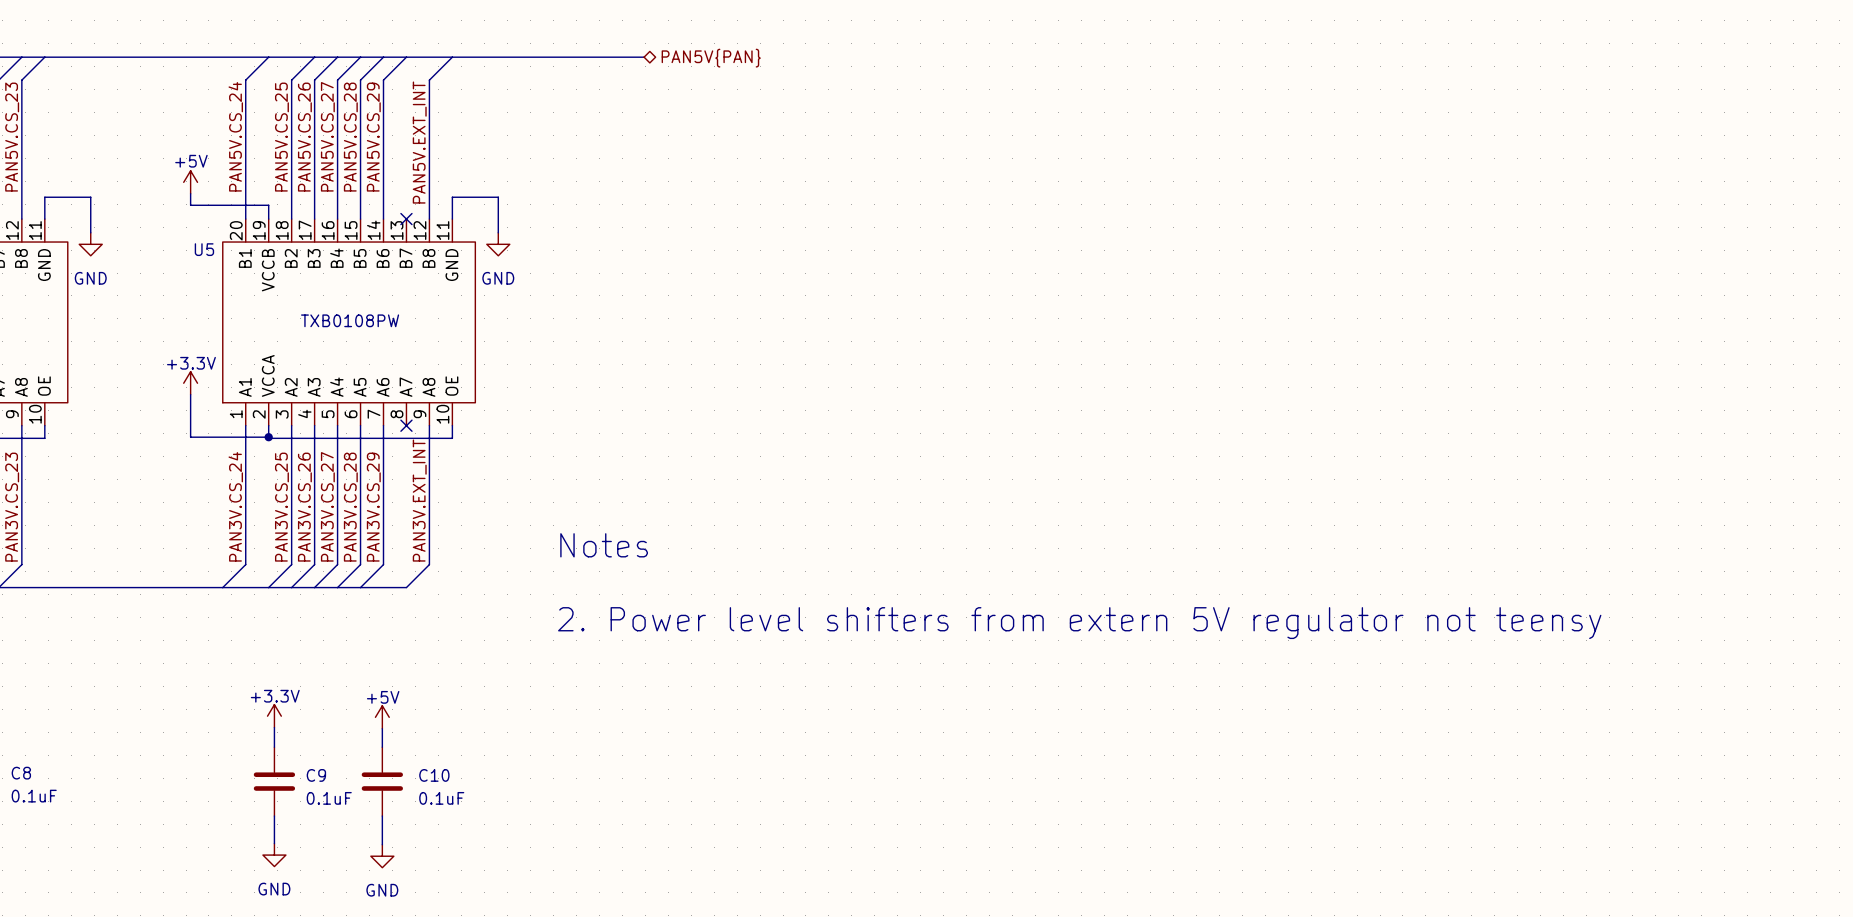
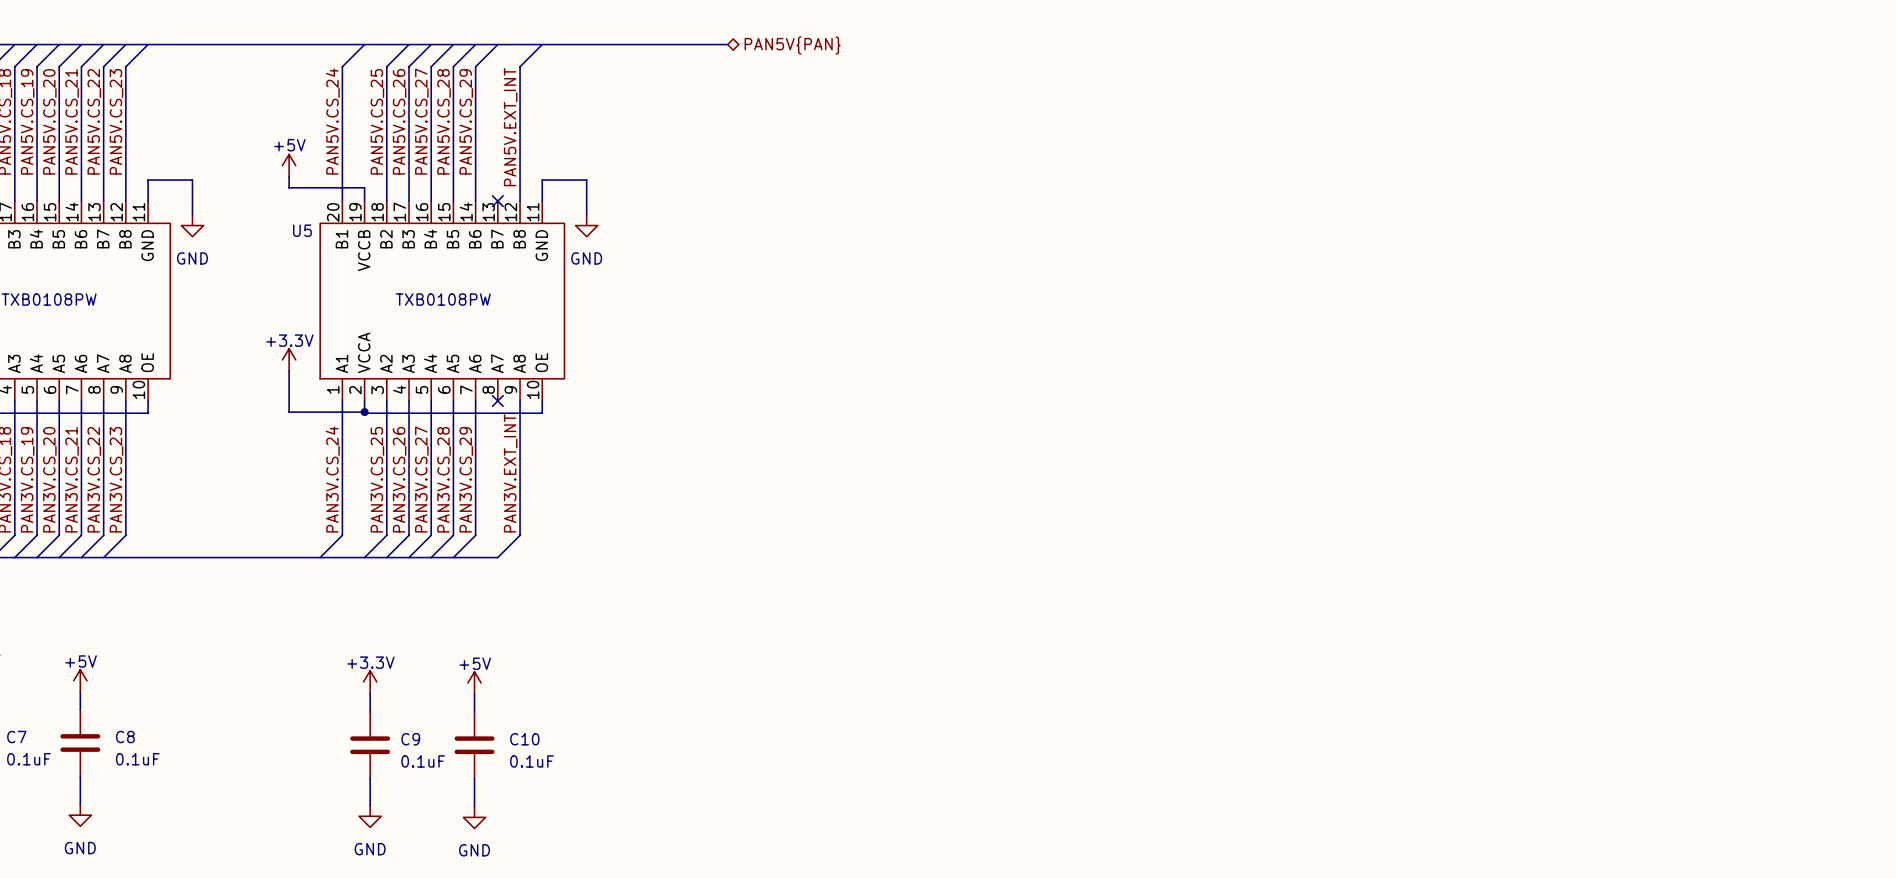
text: Notes (604, 545) -> none
text: 2. Power level shifters from extern 5V regulator not teensy (1079, 623) -> none

